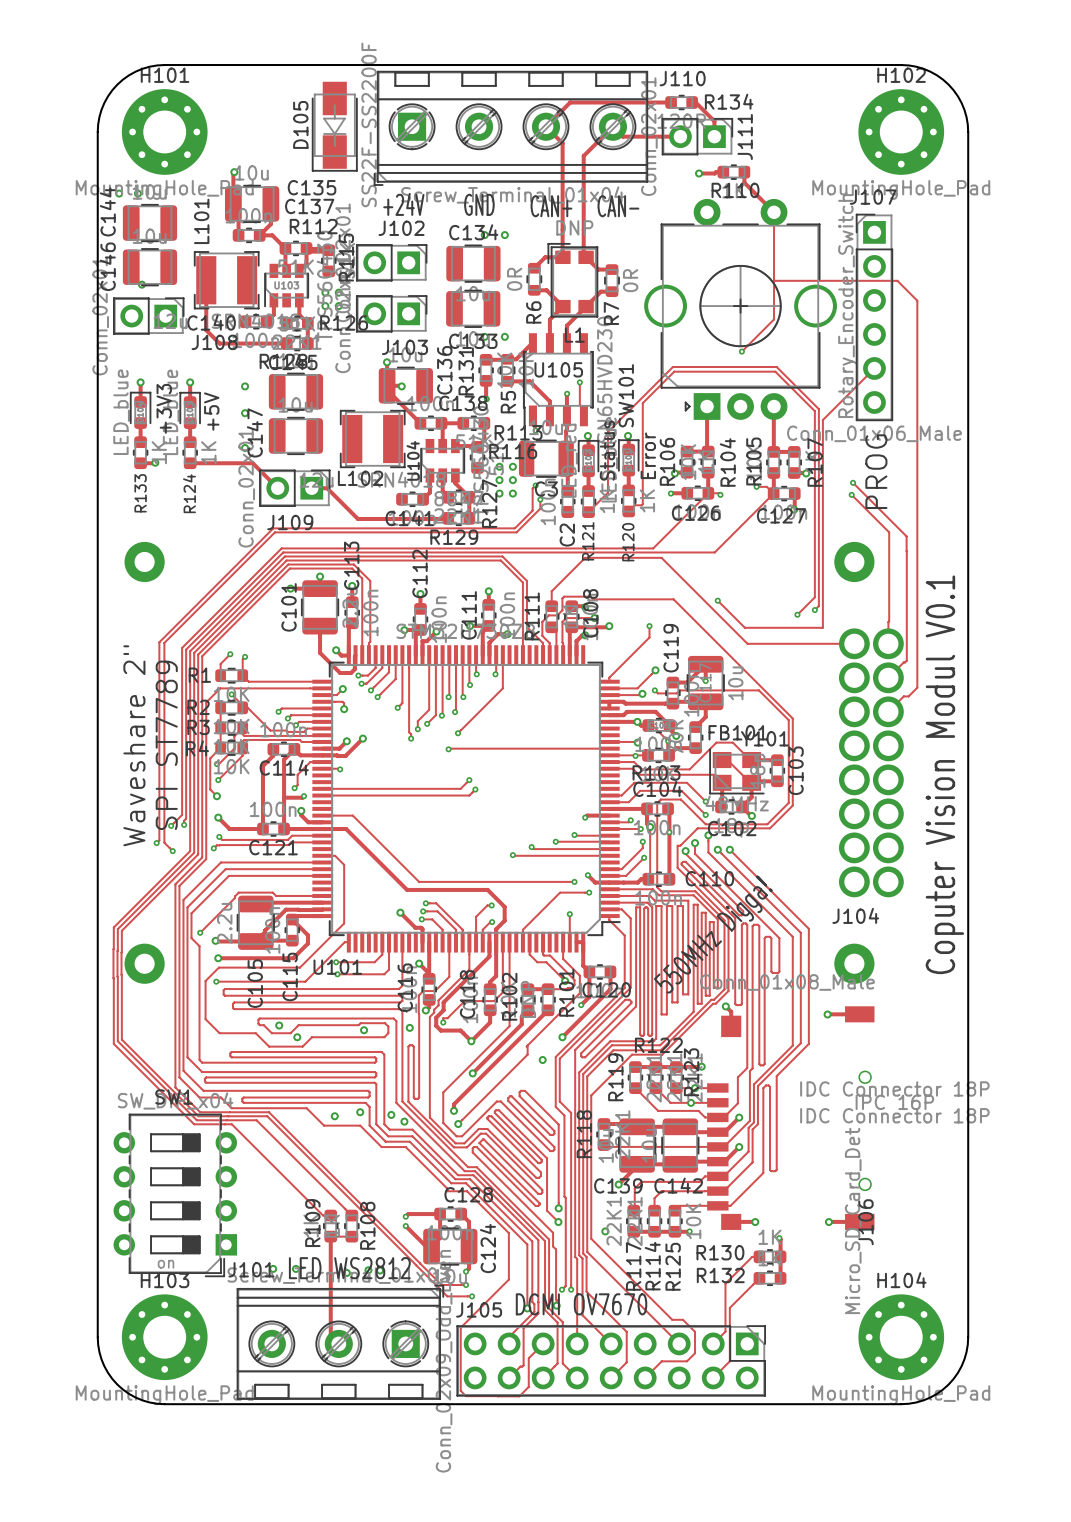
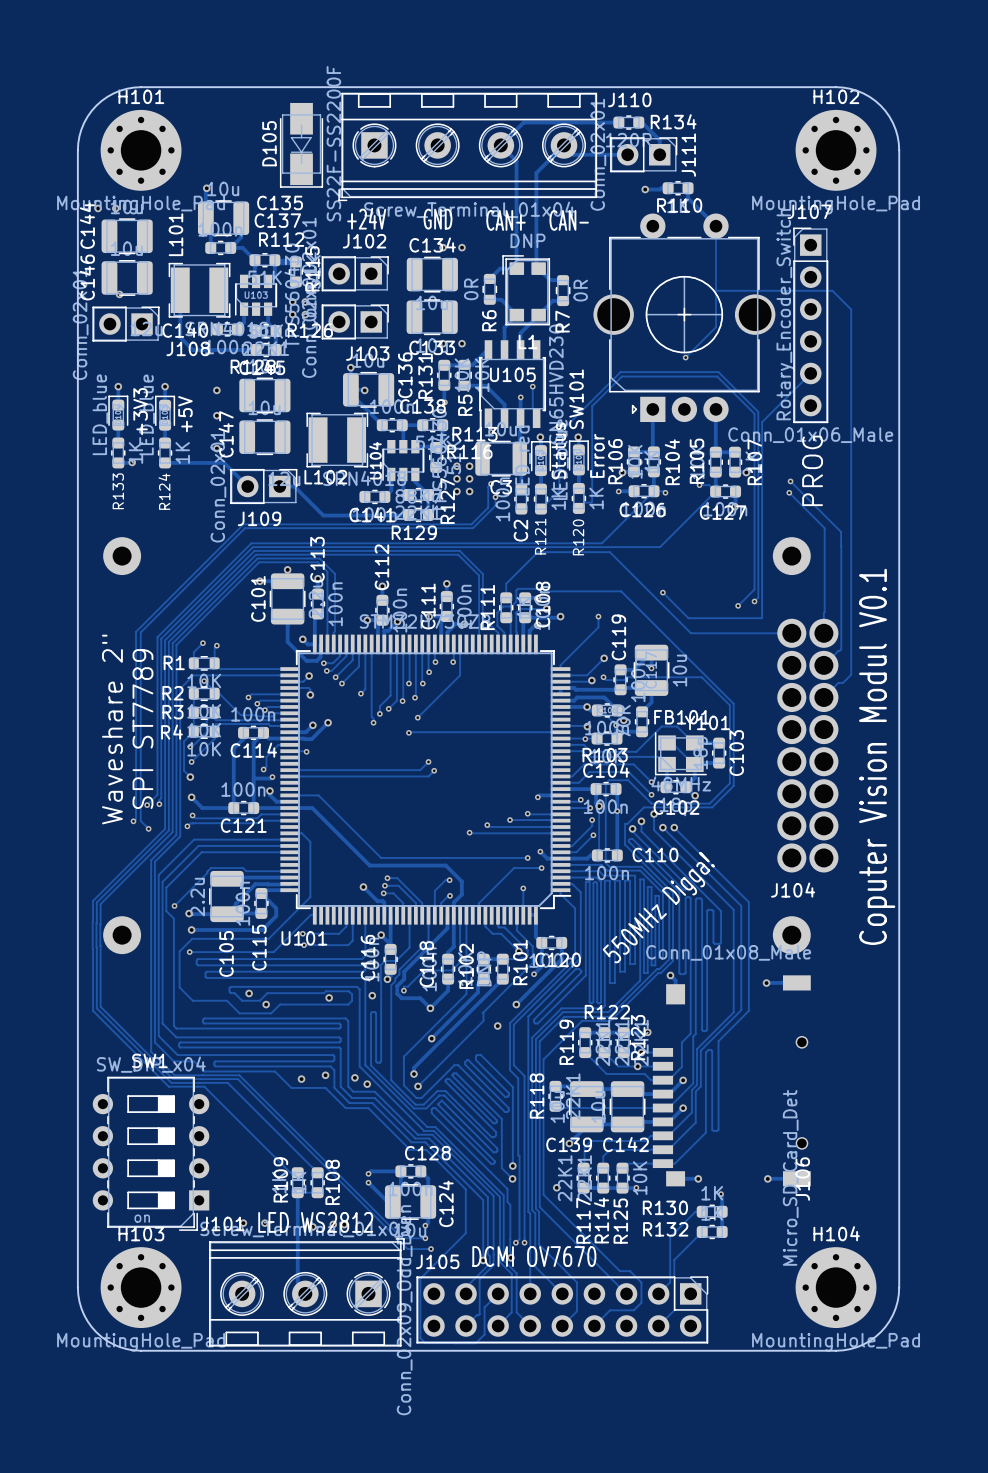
drawing: [800, 1081, 990, 1124] -> none

